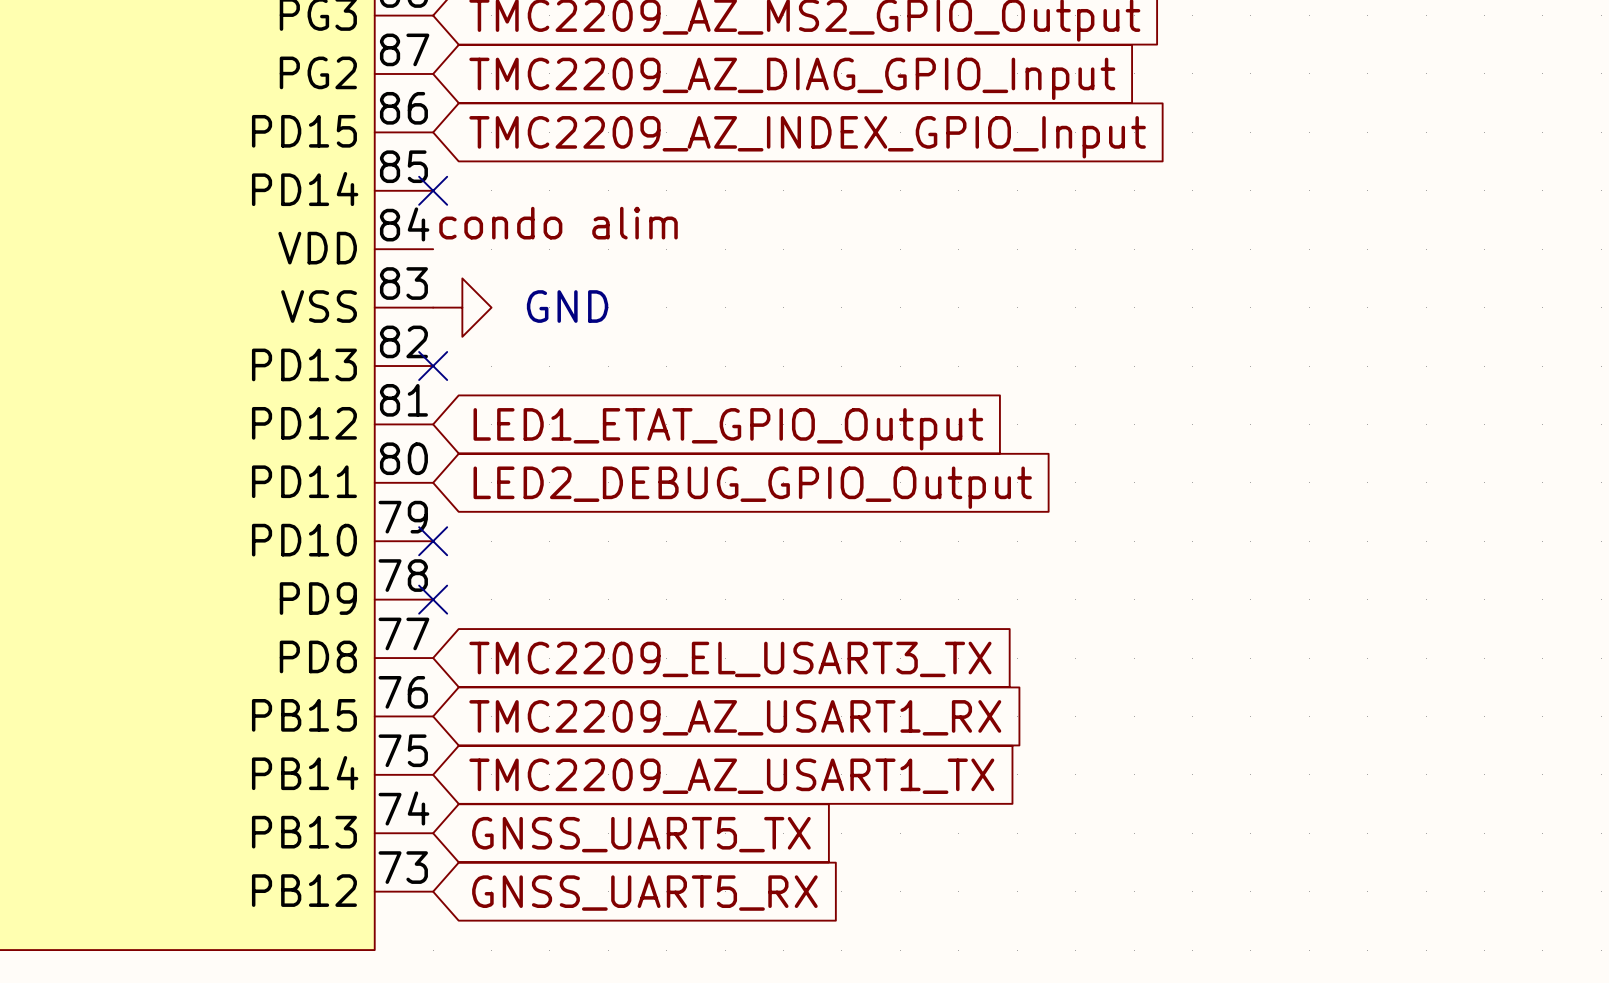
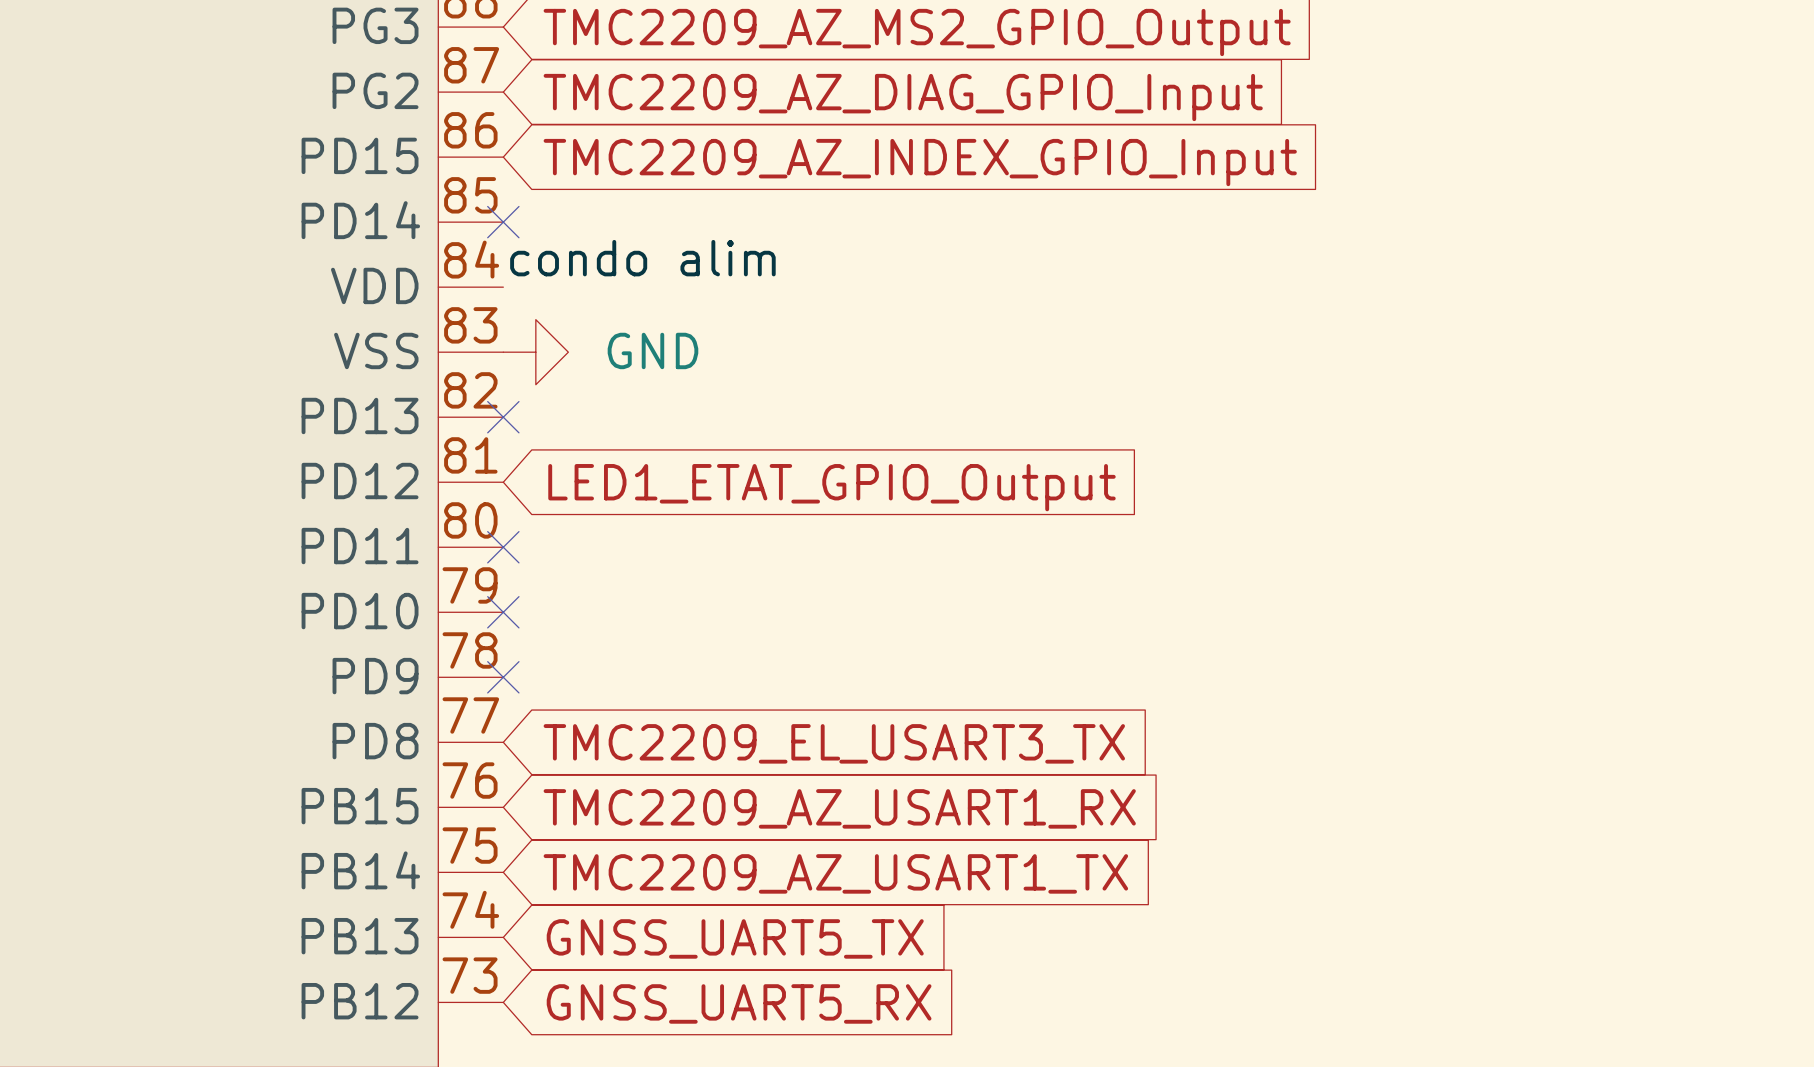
no-connect mark: none -> (503, 547)
global label: LED2_DEBUG_GPIO_Output (752, 487) -> none

